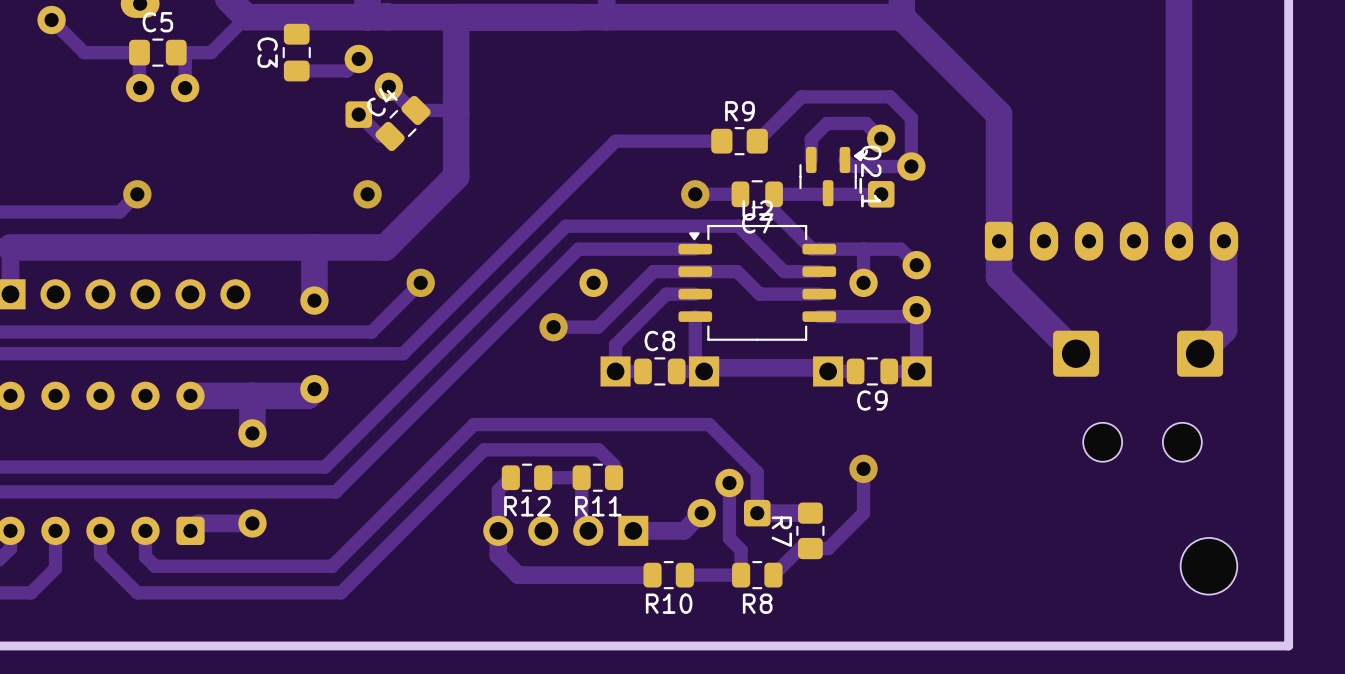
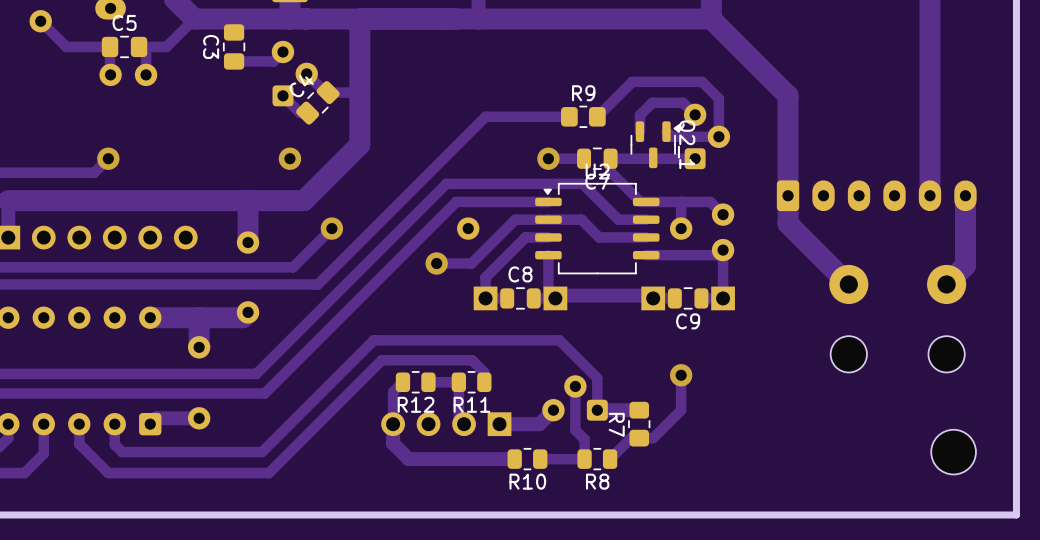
part: (1076, 353) -> none
part: (1200, 353) -> none
part: none -> (848, 318)
part: none -> (946, 318)
part: (1102, 442) -> none
part: (1182, 442) -> none

